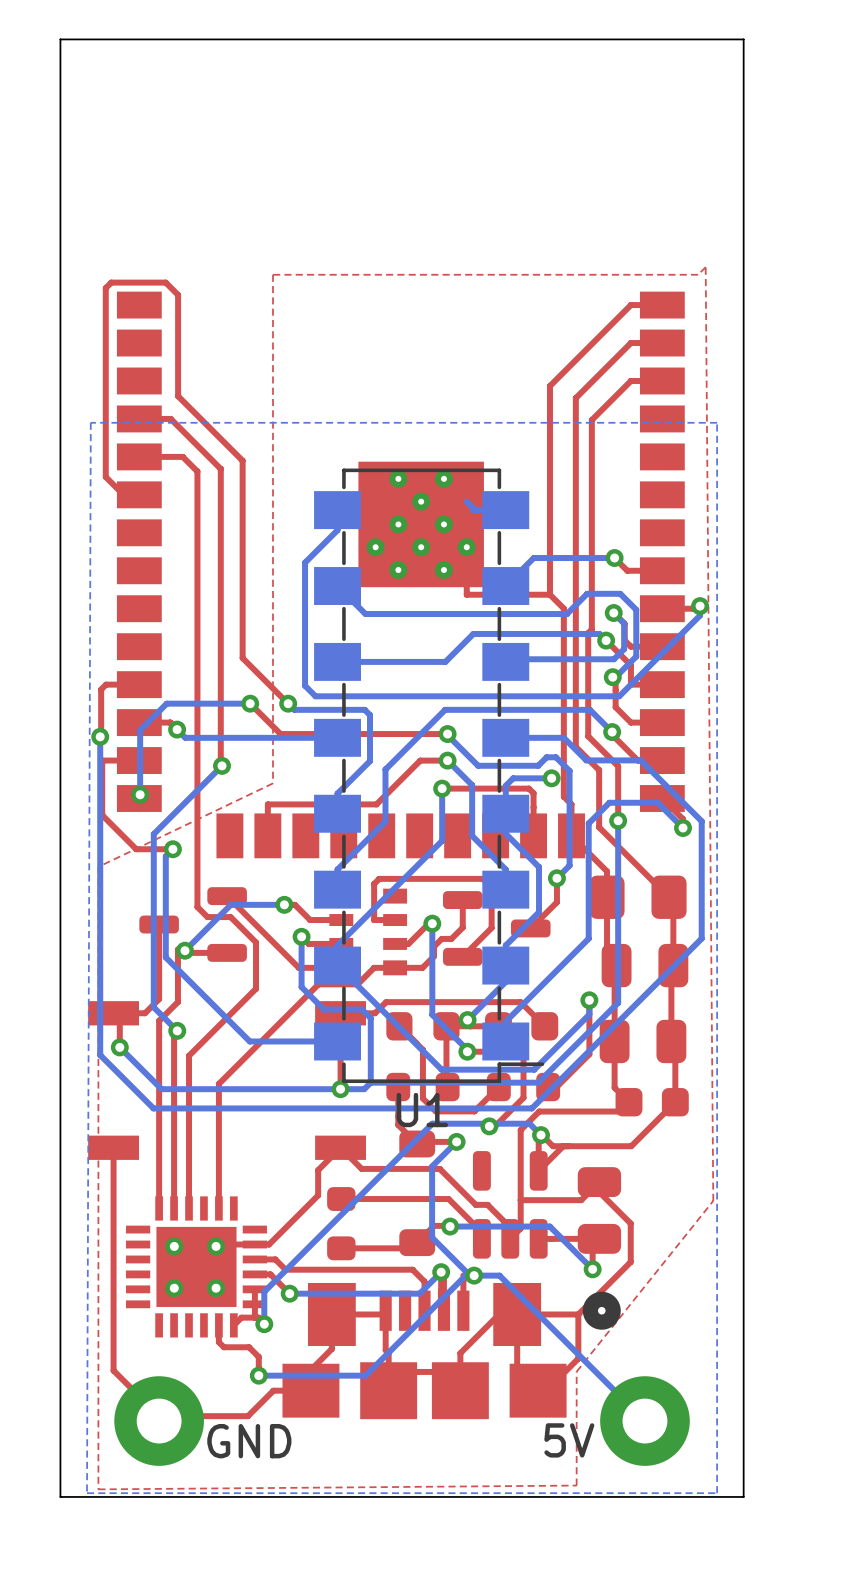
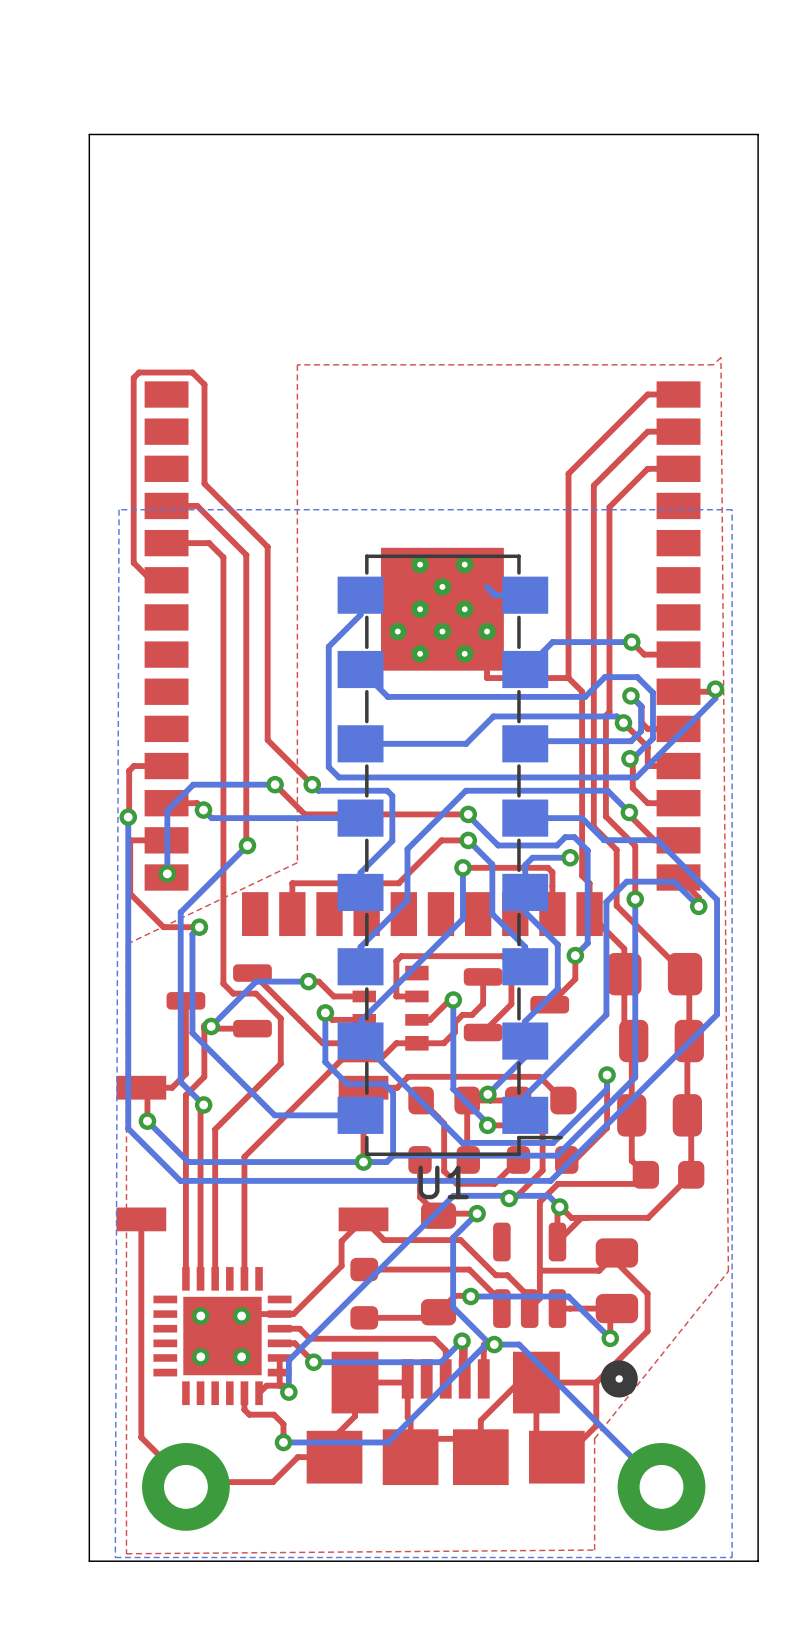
text: 5V (569, 1440) -> none
text: GND (249, 1441) -> none

